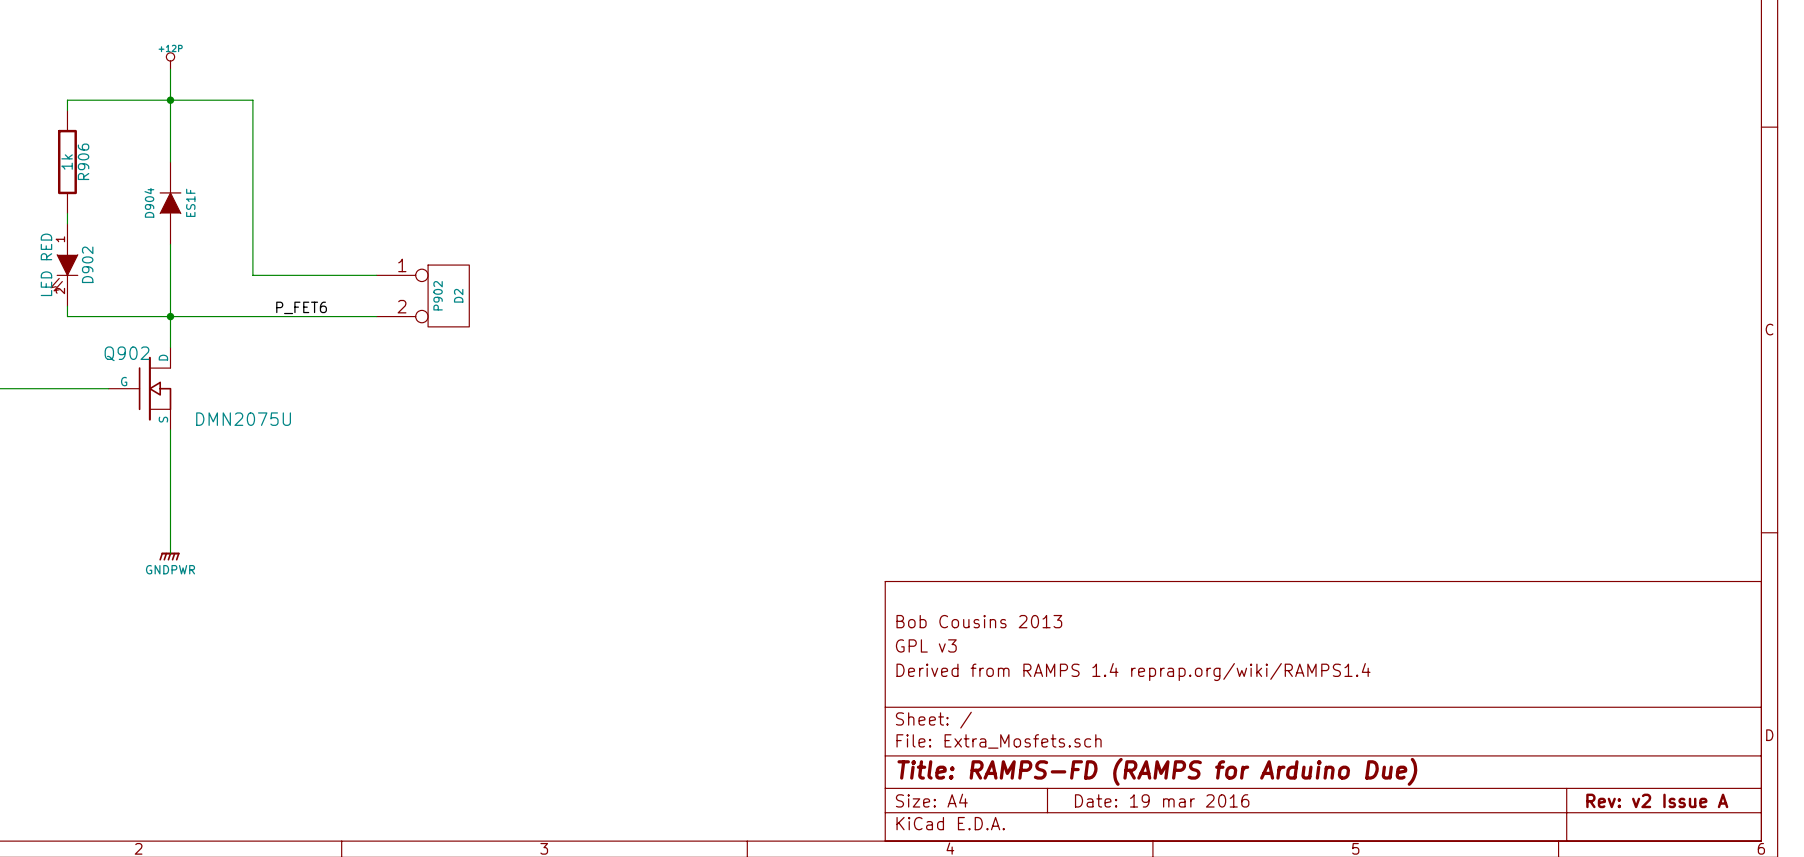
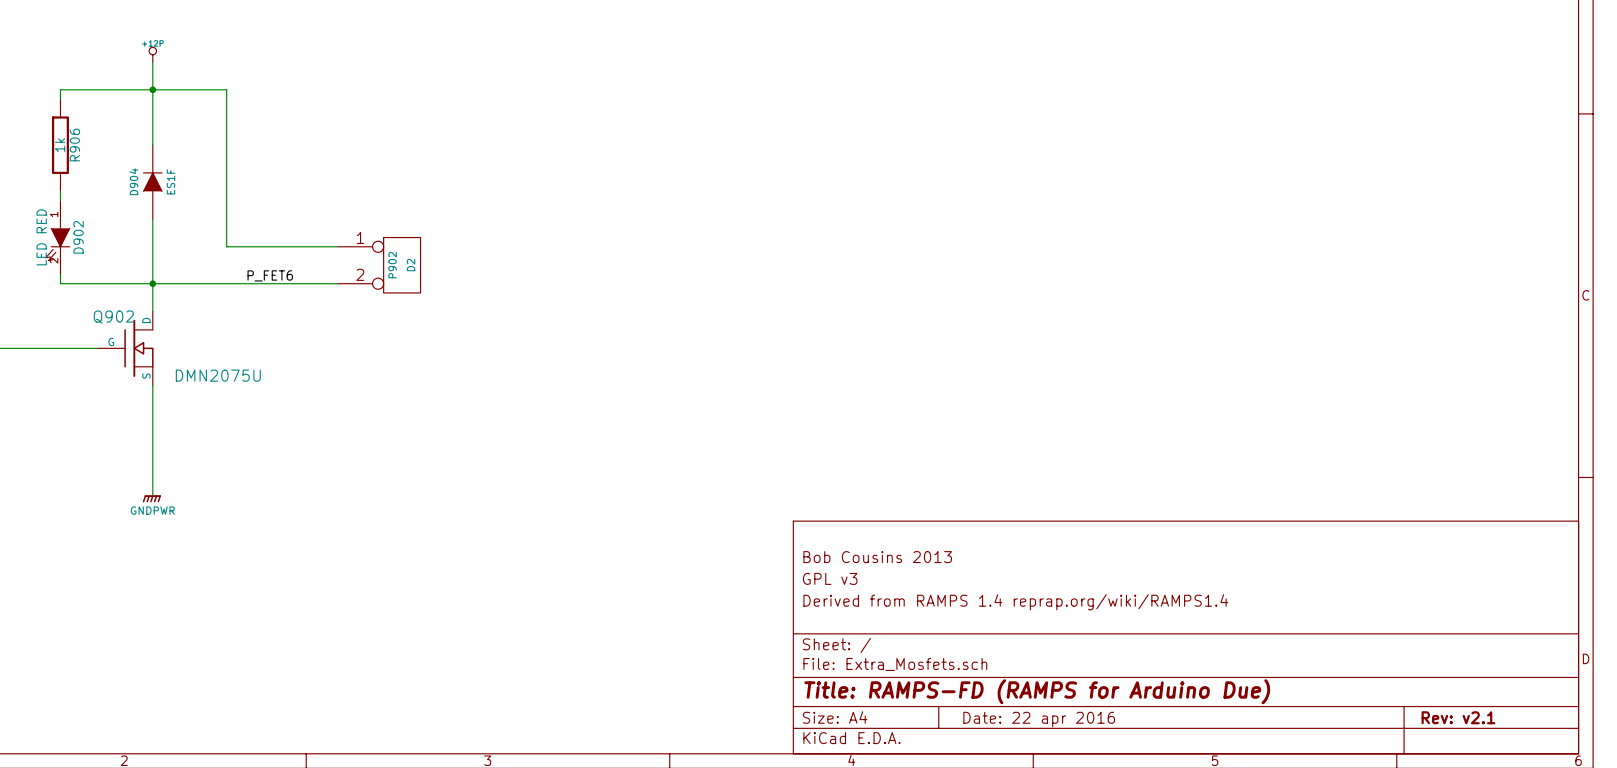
title block: Date: 19 mar 2016 (1162, 800) -> Date: 22 apr 2016 (1039, 719)
title block: Rev: v2 Issue A (1657, 800) -> Rev: v2.1 (1458, 717)

